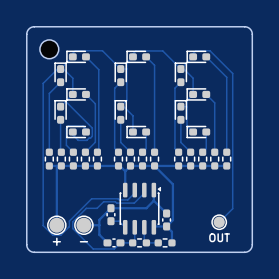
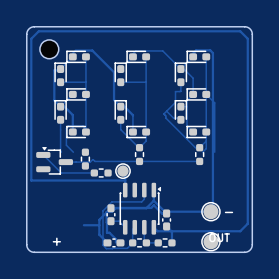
track: (75, 50) (102, 50) (120, 69) (126, 69) -> none
track: (193, 53) (195, 50) (210, 50) (232, 73) (232, 208) (219, 222) -> (193, 53) (196, 50) (210, 50) (212, 53) (212, 209) (210, 211) (168, 211) (162, 213) (153, 205) (151, 207) (115, 207) (111, 211) (106, 212) (106, 222) (107, 232) (115, 239) (115, 242)
track: (85, 56) (98, 69) (97, 152) -> (85, 56) (85, 128)
track: (146, 56) (154, 65) (154, 152) -> (146, 56) (146, 132)
track: (206, 56) (226, 77) (226, 152) -> (206, 56) (206, 132)
track: (126, 62) (126, 100) (122, 105) (132, 115) -> (75, 50) (92, 50) (114, 72) (114, 99) (120, 106) (124, 106) (132, 115)
track: (62, 67) (72, 78) (72, 94) -> none
track: (60, 69) (57, 69) (43, 83) (43, 225) (52, 235) (60, 235) (69, 226) (69, 221) (91, 198) (127, 199) (134, 192) (134, 190) -> (60, 69) (54, 70) (54, 100) (60, 106)
track: (60, 82) (49, 93) (49, 152) -> (60, 82) (85, 82)
track: (120, 82) (114, 88) (114, 148) (118, 152) -> (120, 82) (146, 82)
track: (180, 82) (174, 88) (174, 148) (178, 152) -> (180, 82) (180, 91) (175, 91) (175, 102) (163, 113) (195, 147) (199, 147) (206, 141)
track: (85, 94) (95, 103) (95, 142) (85, 152) -> none
track: (65, 101) (92, 128) (92, 136) (86, 140) (78, 140) (72, 134) (72, 132) -> (62, 104) (72, 115) (72, 132)
track: (180, 119) (180, 142) (190, 152) -> (180, 119) (173, 118) (166, 111)
track: (120, 129) (120, 142) (130, 152) -> (120, 129) (138, 147) (146, 141)
track: (146, 141) (146, 148) (142, 152) -> none
track: none -> (43, 154) (61, 172) (94, 172)
part: none -> (139, 154)
part: none -> (199, 154)
part: (49, 159) -> none
part: (61, 159) -> none
part: (73, 159) -> none
part: (97, 159) -> none
part: (118, 159) -> none
part: (130, 159) -> none
part: (142, 159) -> none
part: (154, 159) -> none
part: (178, 159) -> none
part: (190, 159) -> none
part: (202, 159) -> none
part: (214, 159) -> none
part: (226, 159) -> none
part: none -> (54, 160)
track: none -> (199, 161) (94, 161) (92, 159) (90, 162) (65, 162)
track: (56, 165) (56, 225) -> none
track: (154, 165) (172, 184) (172, 220) (166, 226) (153, 227) -> (125, 180) (31, 180) (31, 38) (38, 31) (240, 31) (247, 38) (247, 223) (240, 231) (157, 231) (153, 227)
track: (226, 165) (130, 165) (125, 171) (119, 165) (49, 165) -> none
part: none -> (101, 172)
track: (144, 193) (134, 203) (103, 201) (97, 208) (86, 208) (72, 222) (72, 228) (93, 248) (114, 248) (120, 242) (132, 242) (134, 240) (134, 227) -> (144, 193) (144, 199) (141, 201) (111, 201) (102, 210) (102, 245) (106, 248) (127, 248) (132, 244) (132, 229) (134, 227)
part: none -> (210, 211)
part position: (219, 222) -> (122, 171)
part: (56, 225) -> none
part: (83, 225) -> none
text position: − (83, 241) -> − (228, 212)
part: none -> (210, 241)

